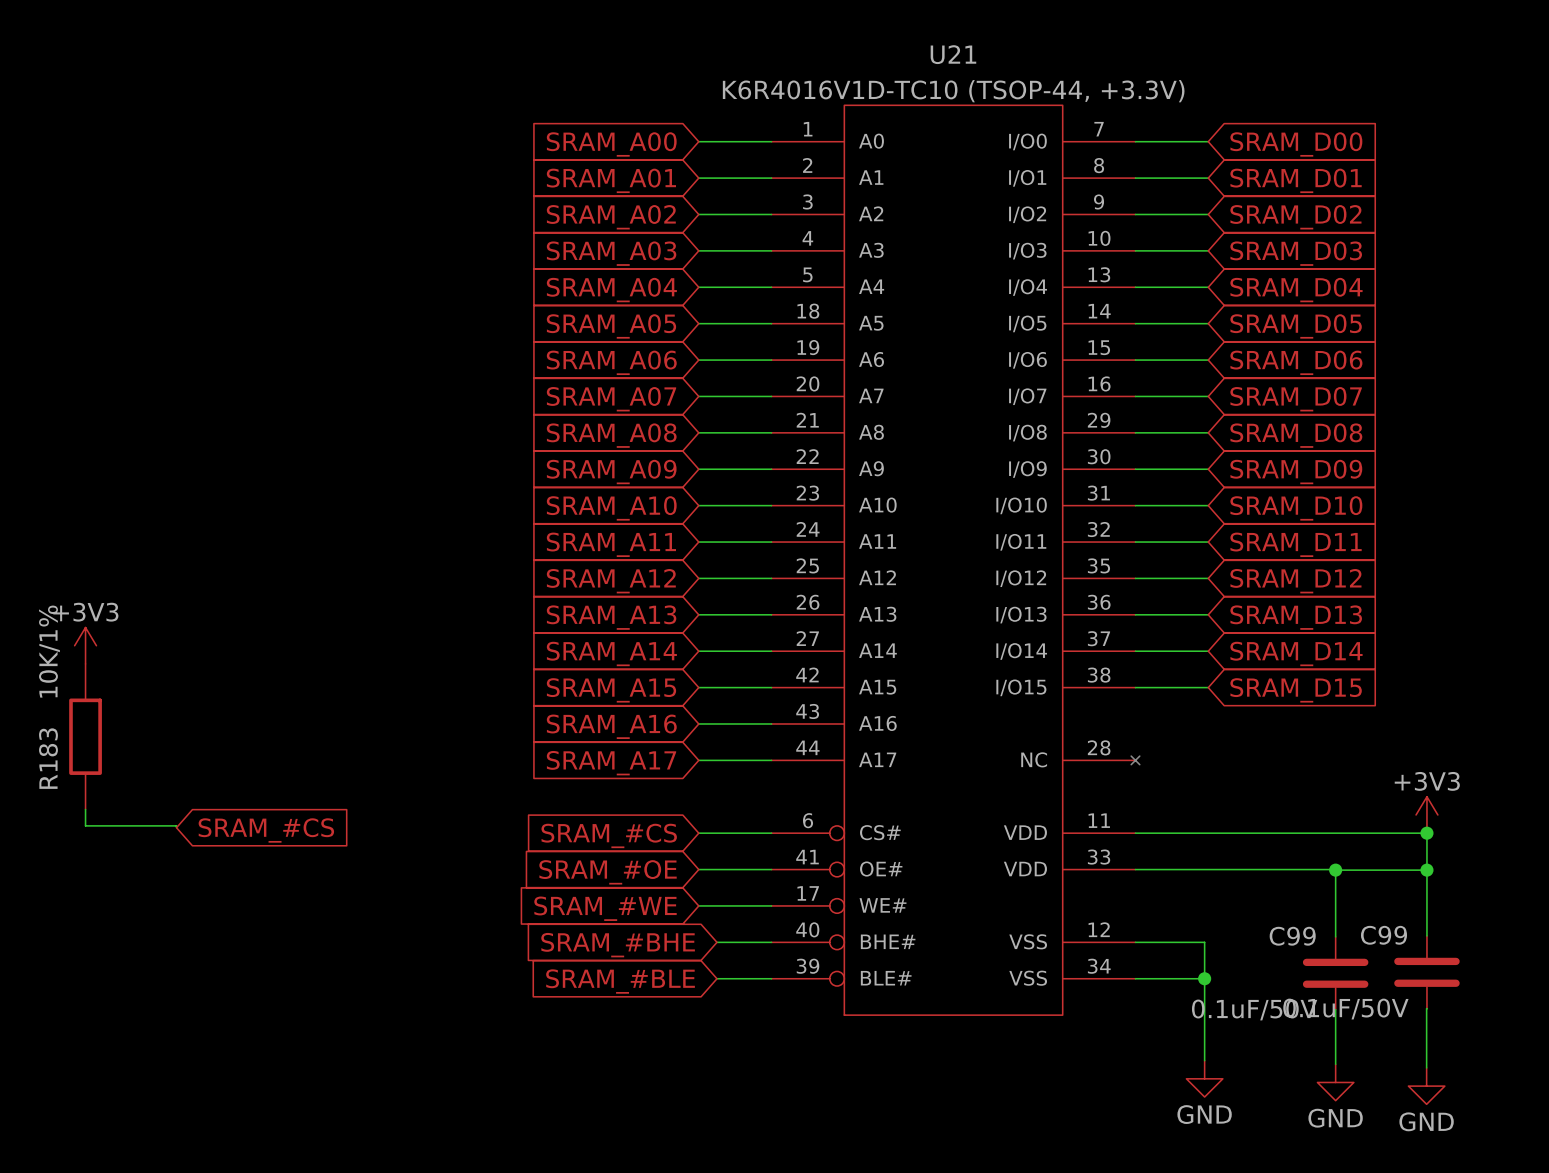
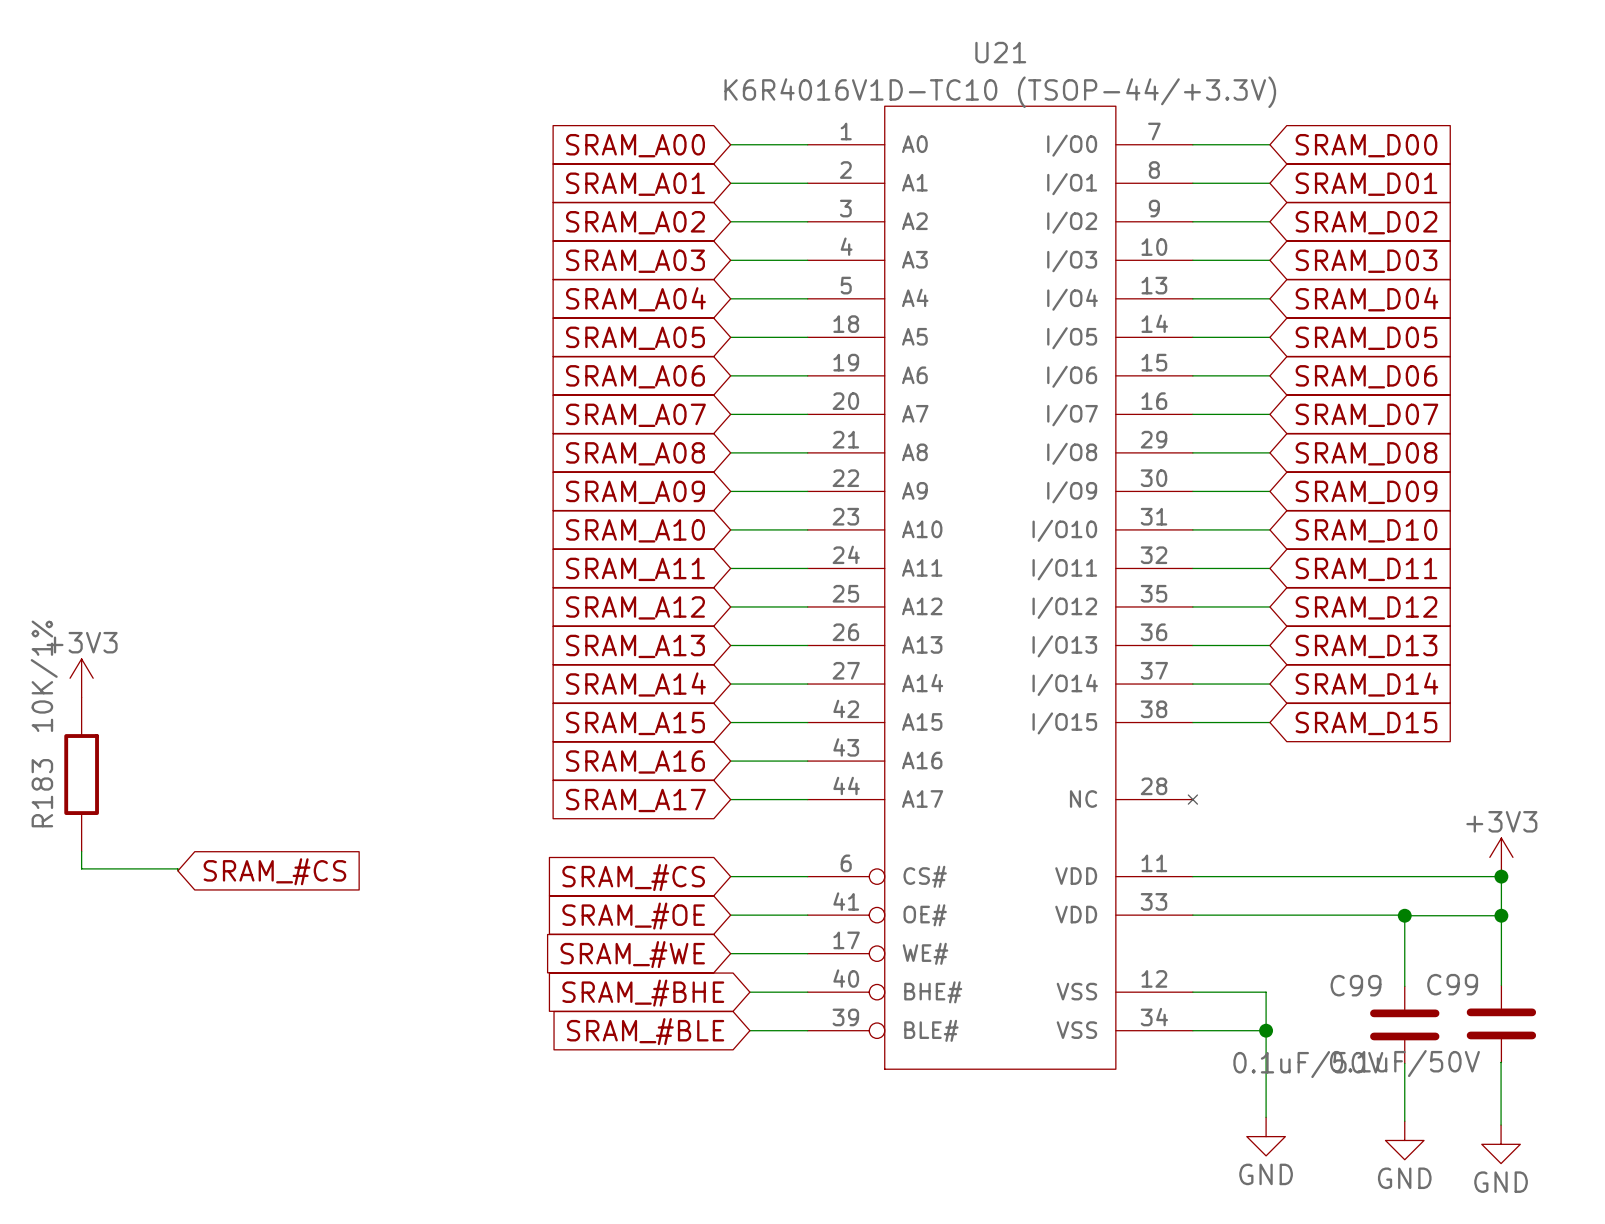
U21 value: K6R4016V1D-TC10 (TSOP-44, +3.3V) (953, 91) -> K6R4016V1D-TC10 (TSOP-44/+3.3V) (1000, 92)

